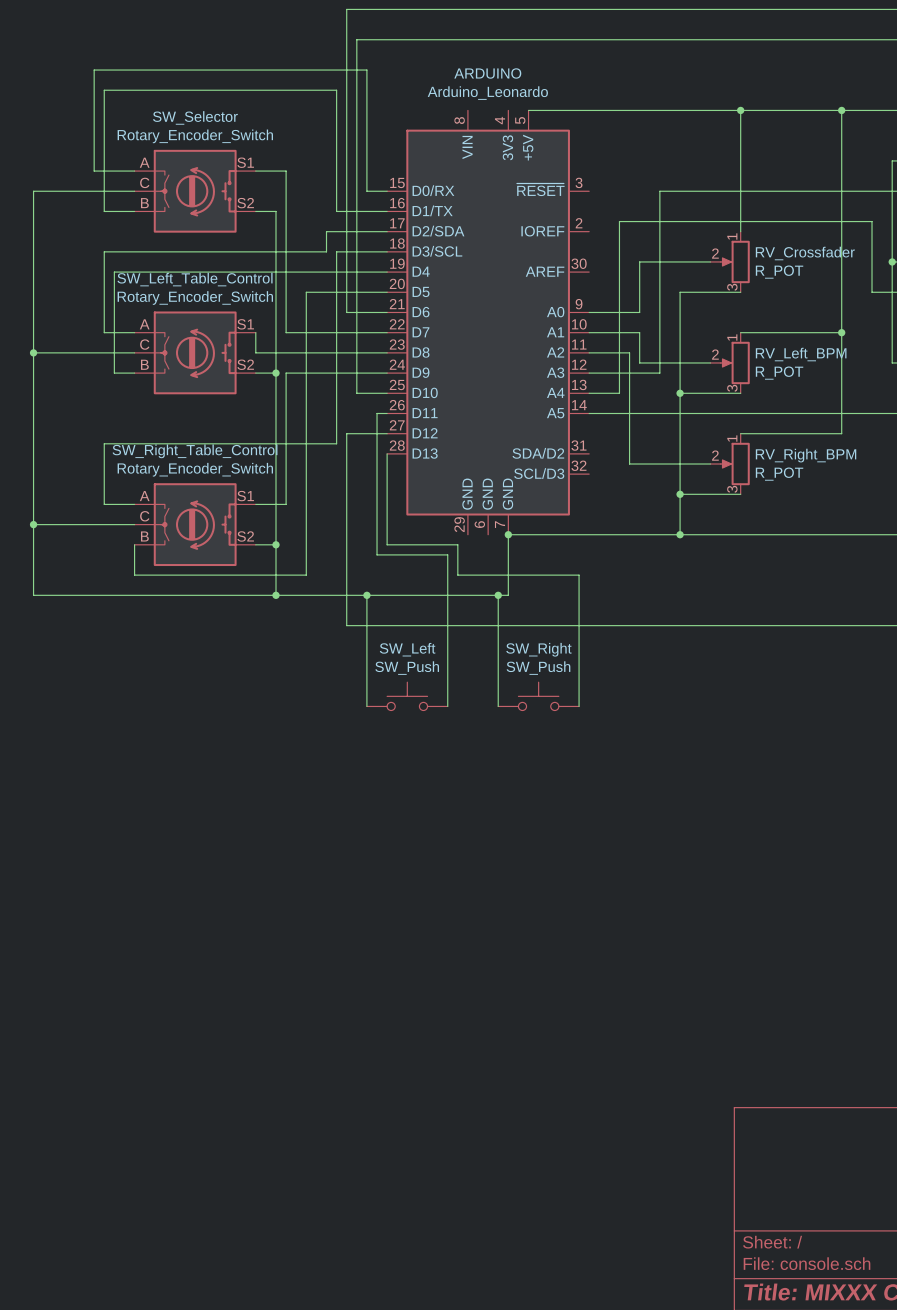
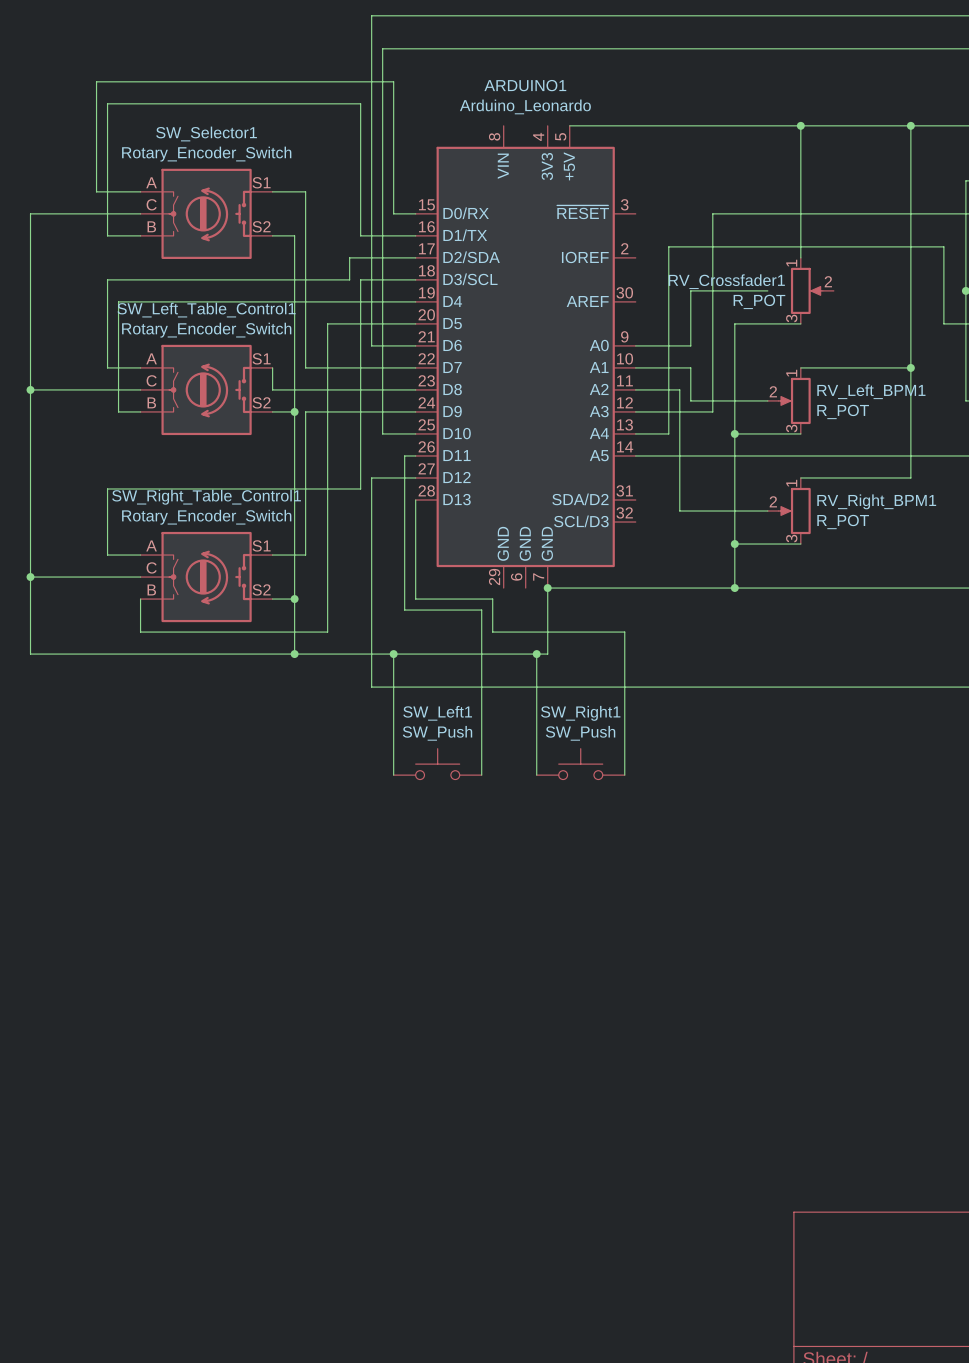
ARDUINO name: ARDUINO (487, 73) -> ARDUINO1 (525, 85)
SW_Selector name: SW_Selector (195, 117) -> SW_Selector1 (206, 133)
RV_Crossfader: R_POT (730, 261) -> none
RV_Crossfader1: none -> R_POT (812, 290)
SW_Left_Table_Control name: SW_Left_Table_Control (195, 279) -> SW_Left_Table_Control1 (206, 310)
RV_Left_BPM name: RV_Left_BPM (801, 354) -> RV_Left_BPM1 (871, 391)
SW_Right_Table_Control name: SW_Right_Table_Control (195, 451) -> SW_Right_Table_Control1 (206, 497)
RV_Right_BPM name: RV_Right_BPM (806, 455) -> RV_Right_BPM1 (876, 501)
SW_Left name: SW_Left (407, 649) -> SW_Left1 (437, 713)
SW_Right name: SW_Right (538, 649) -> SW_Right1 (580, 713)

